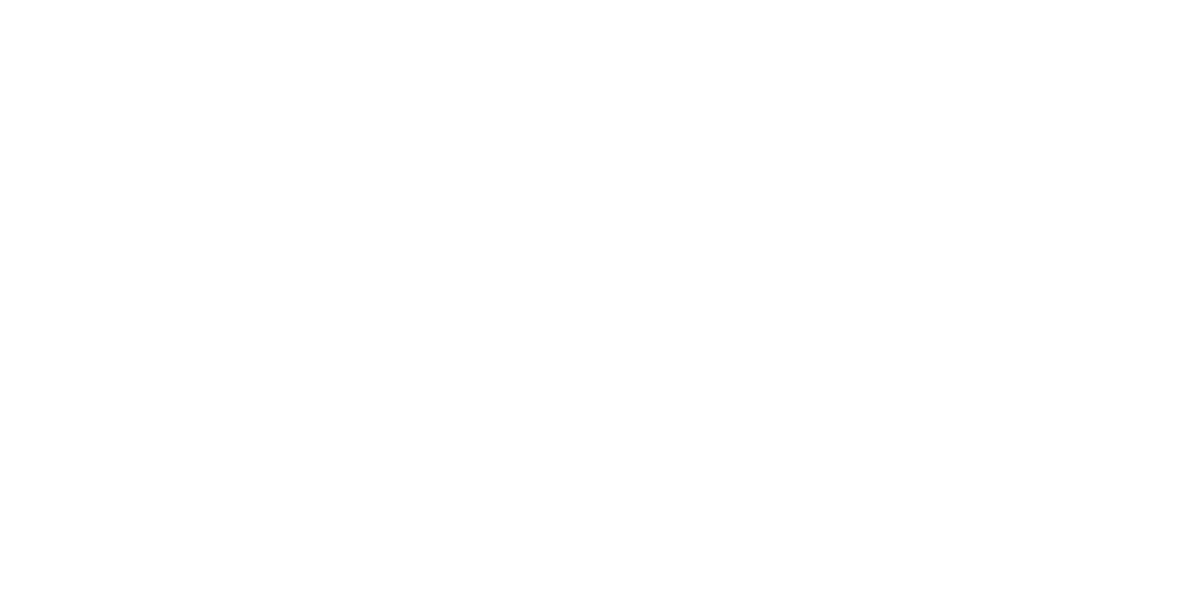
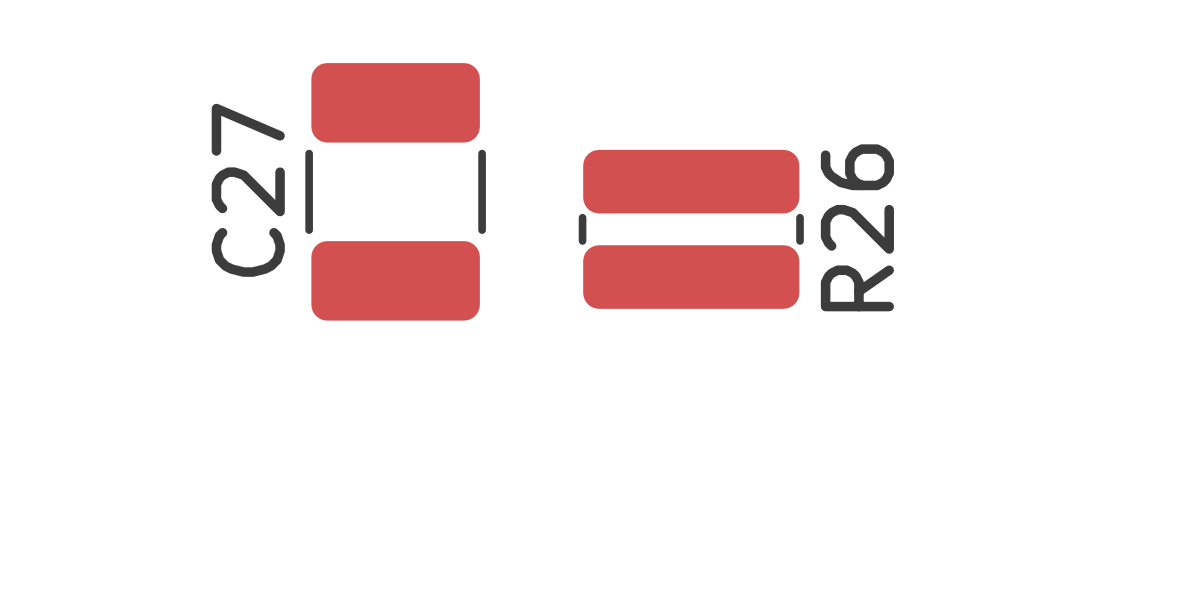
C27: none -> (395, 191)
R26: none -> (691, 229)

